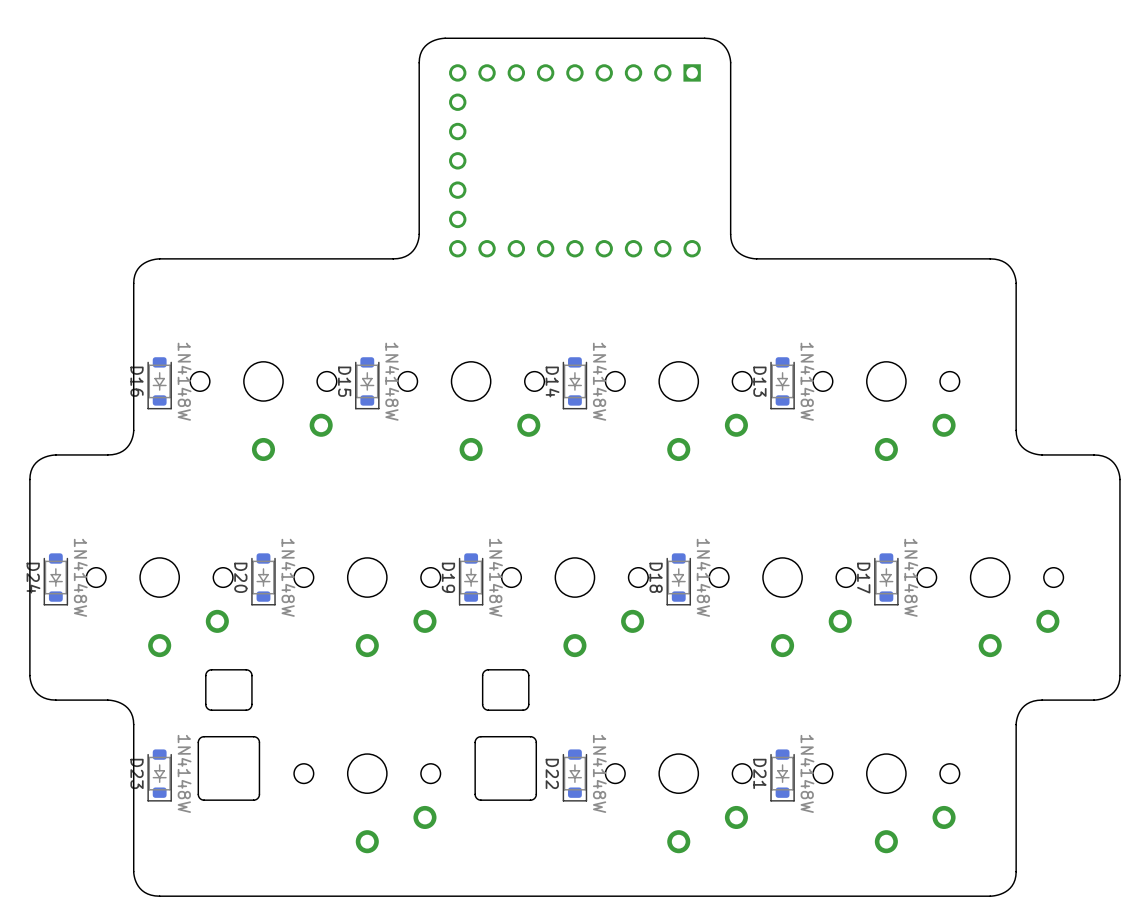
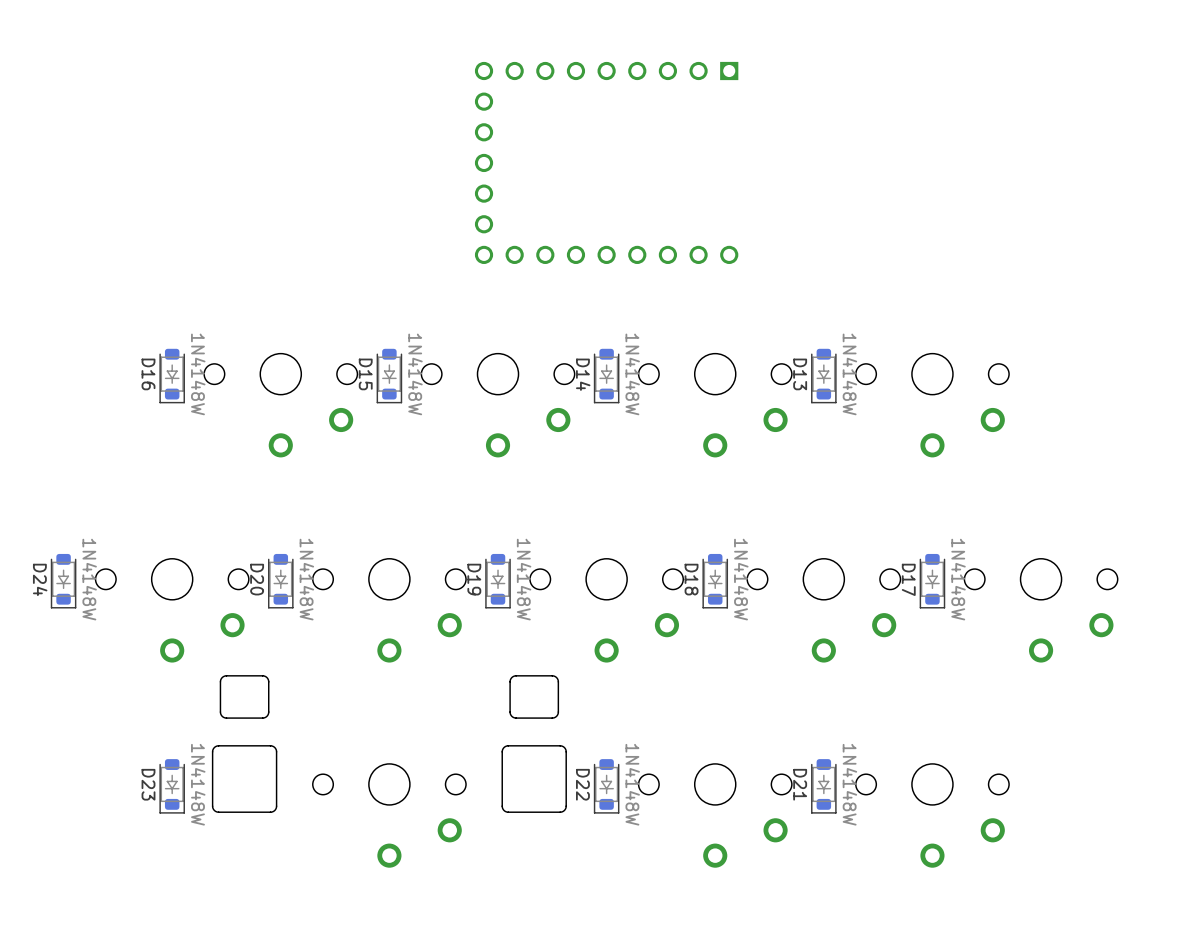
board edge: (704, 38) (445, 38) (434, 40) (425, 46) (419, 58) (419, 234) (417, 244) (410, 253) (401, 257) (393, 258) (158, 258) (146, 261) (137, 269) (133, 283) (133, 430) (130, 442) (122, 451) (112, 454) (47, 456) (35, 462) (31, 471) (29, 675) (34, 690) (43, 697) (55, 700) (111, 700) (123, 704) (131, 713) (133, 724) (133, 872) (136, 883) (144, 892) (159, 896) (990, 896) (1003, 893) (1012, 885) (1016, 871) (1016, 724) (1019, 712) (1027, 703) (1037, 700) (1102, 698) (1113, 692) (1118, 683) (1118, 471) (1111, 460) (1102, 456) (1038, 454) (1026, 450) (1018, 441) (1016, 430) (1016, 282) (1012, 271) (1005, 262) (990, 258) (756, 258) (746, 256) (736, 250) (731, 242) (730, 234) (730, 58) (722, 43) (713, 39) (704, 38) -> none
part position: (574, 160) -> (606, 162)

